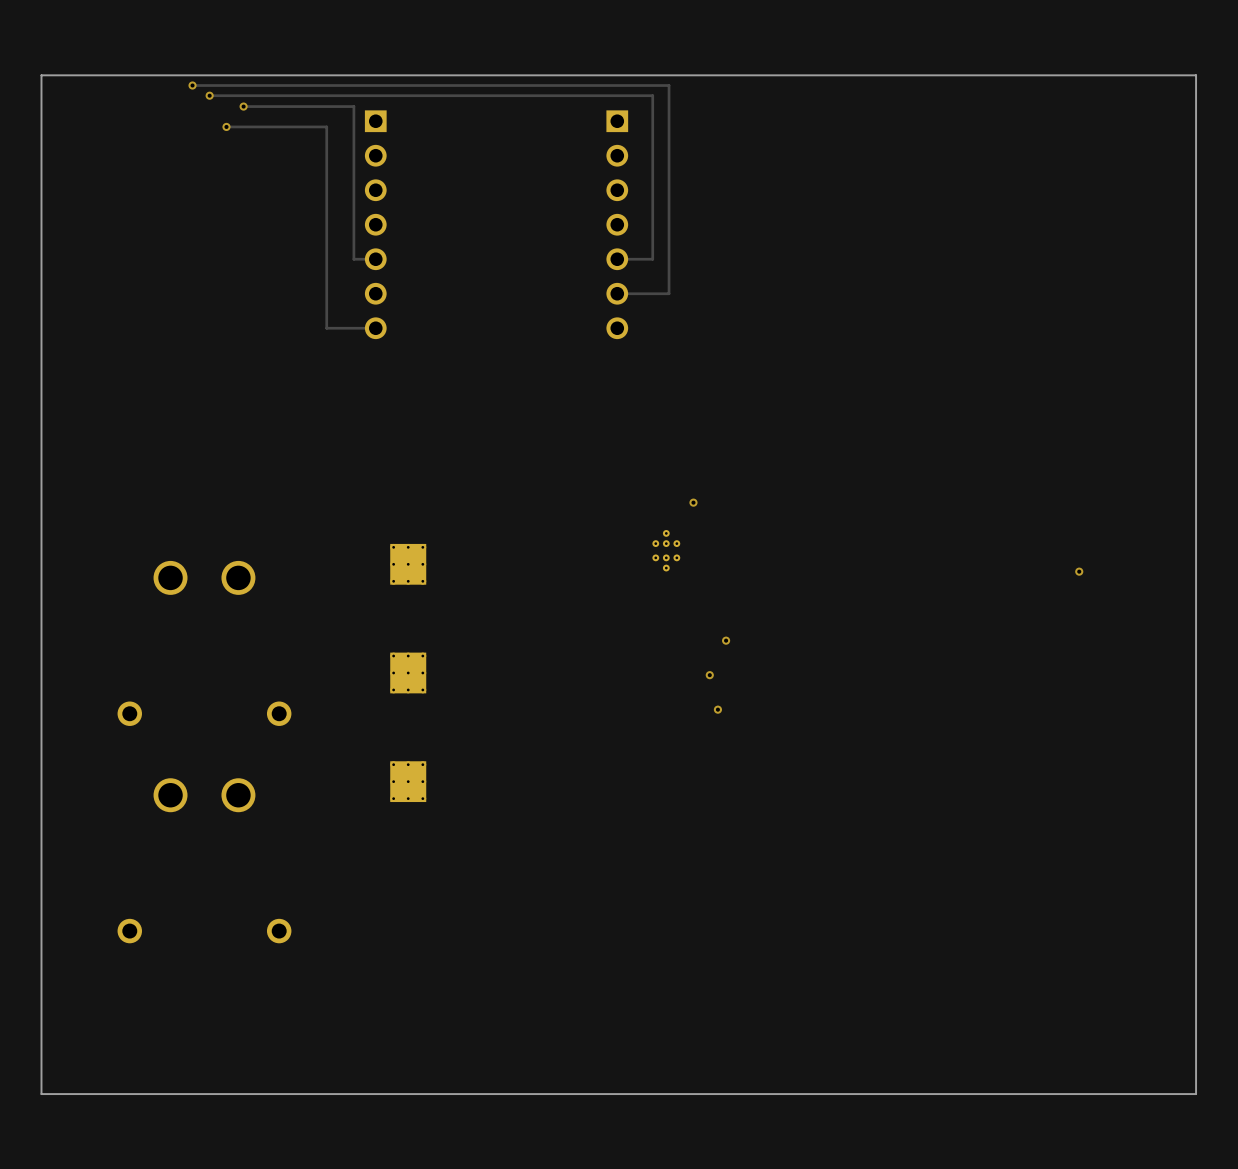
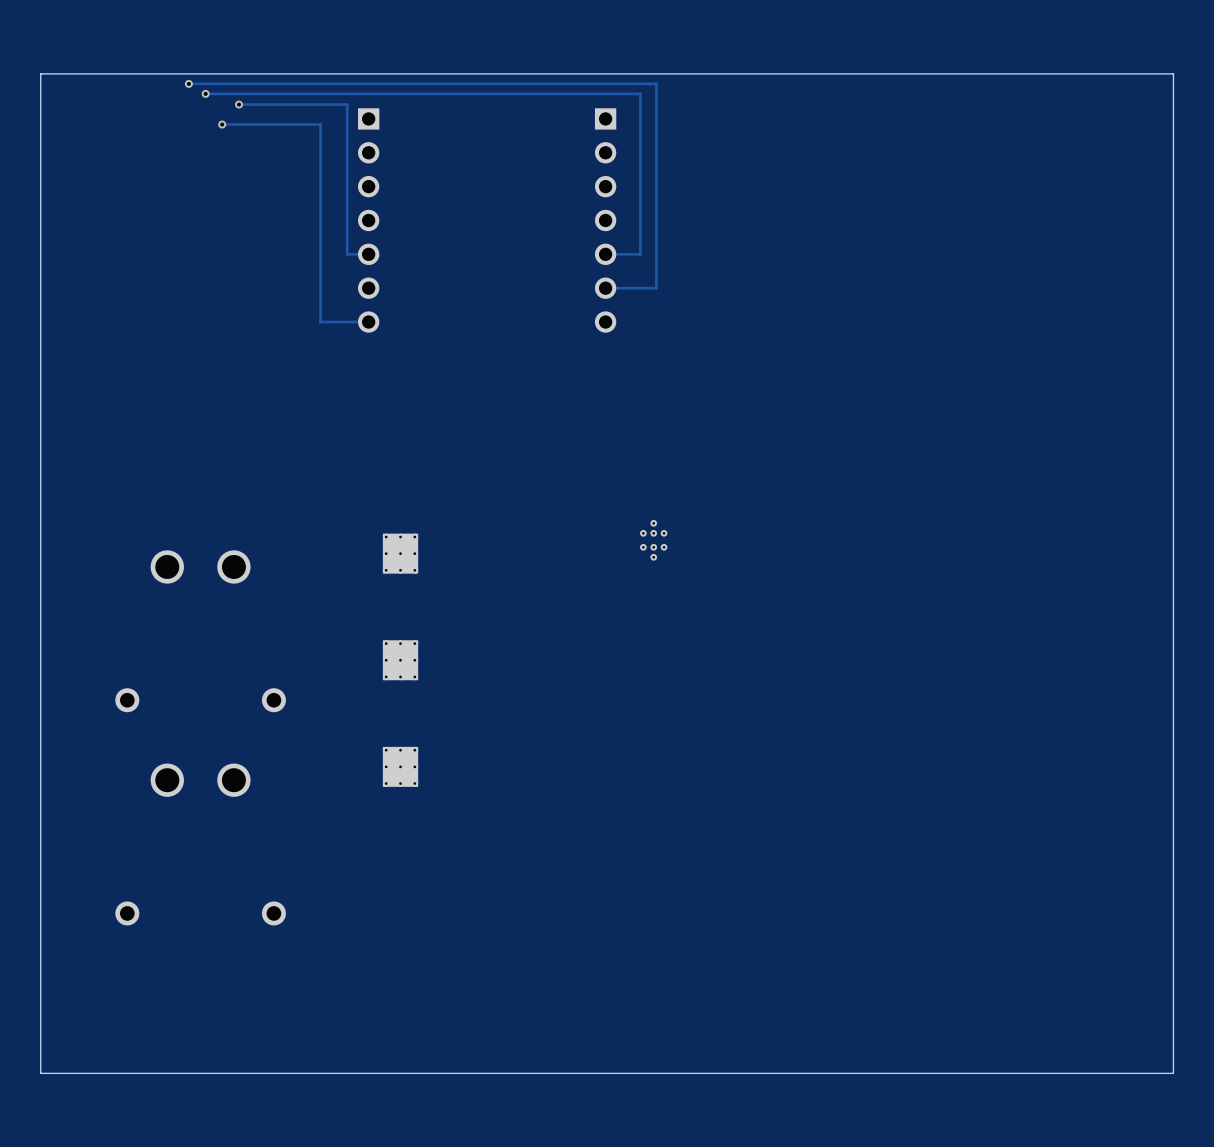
via: (693, 502) -> none
via: (1079, 571) -> none
via: (726, 640) -> none
via: (709, 675) -> none
via: (717, 709) -> none

